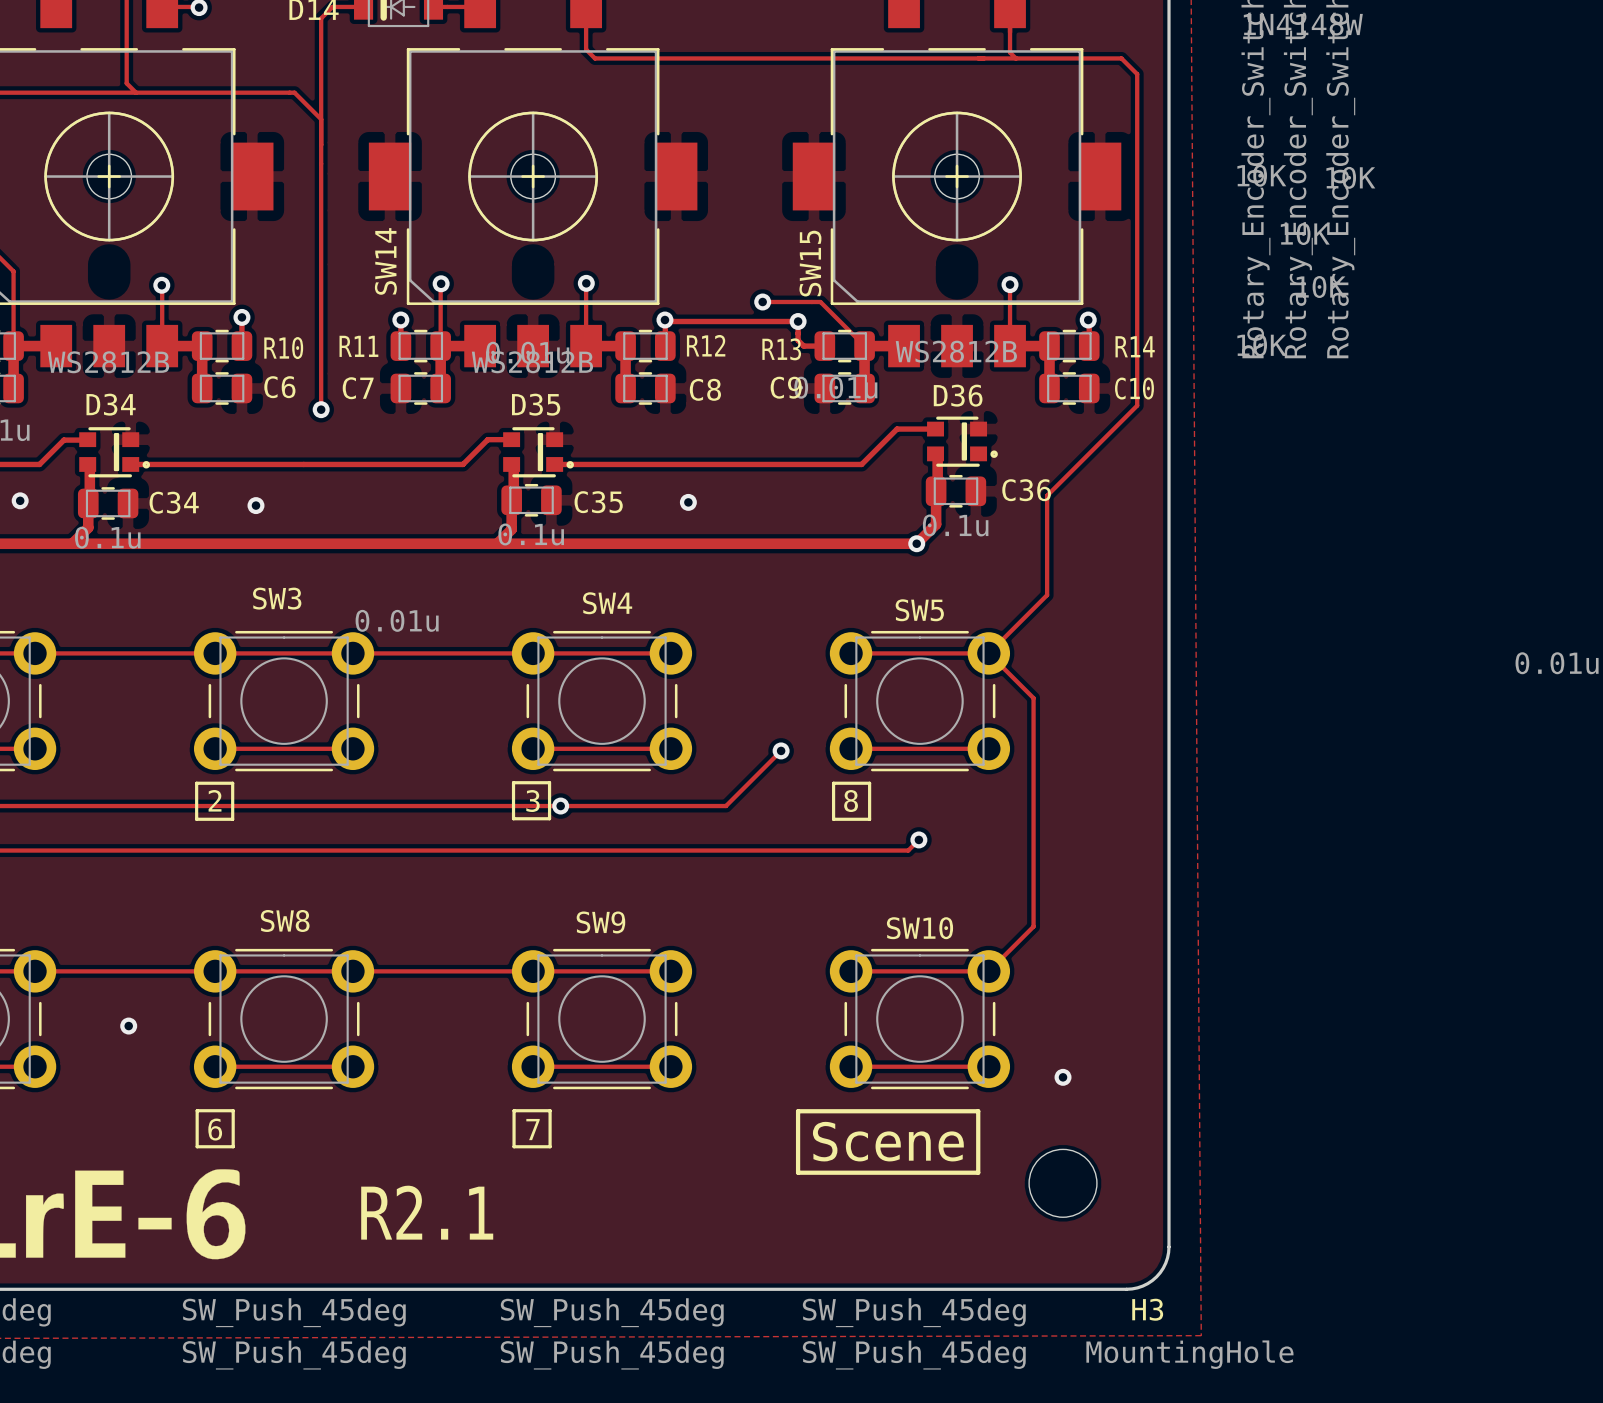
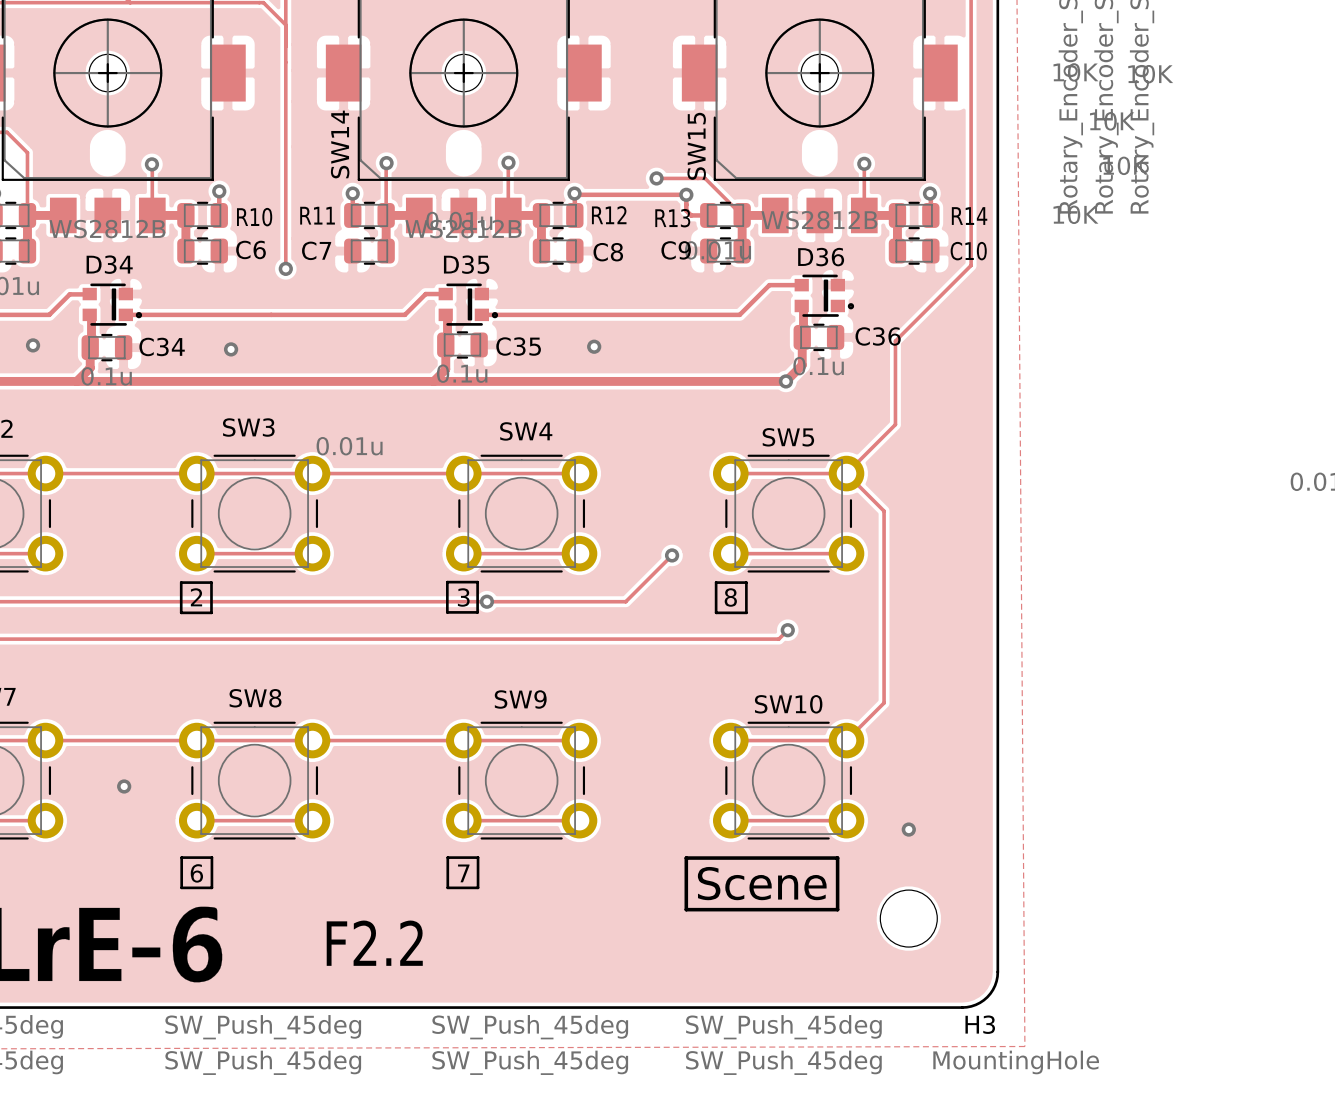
text: R2.1 (427, 1212) -> F2.2 (374, 943)

